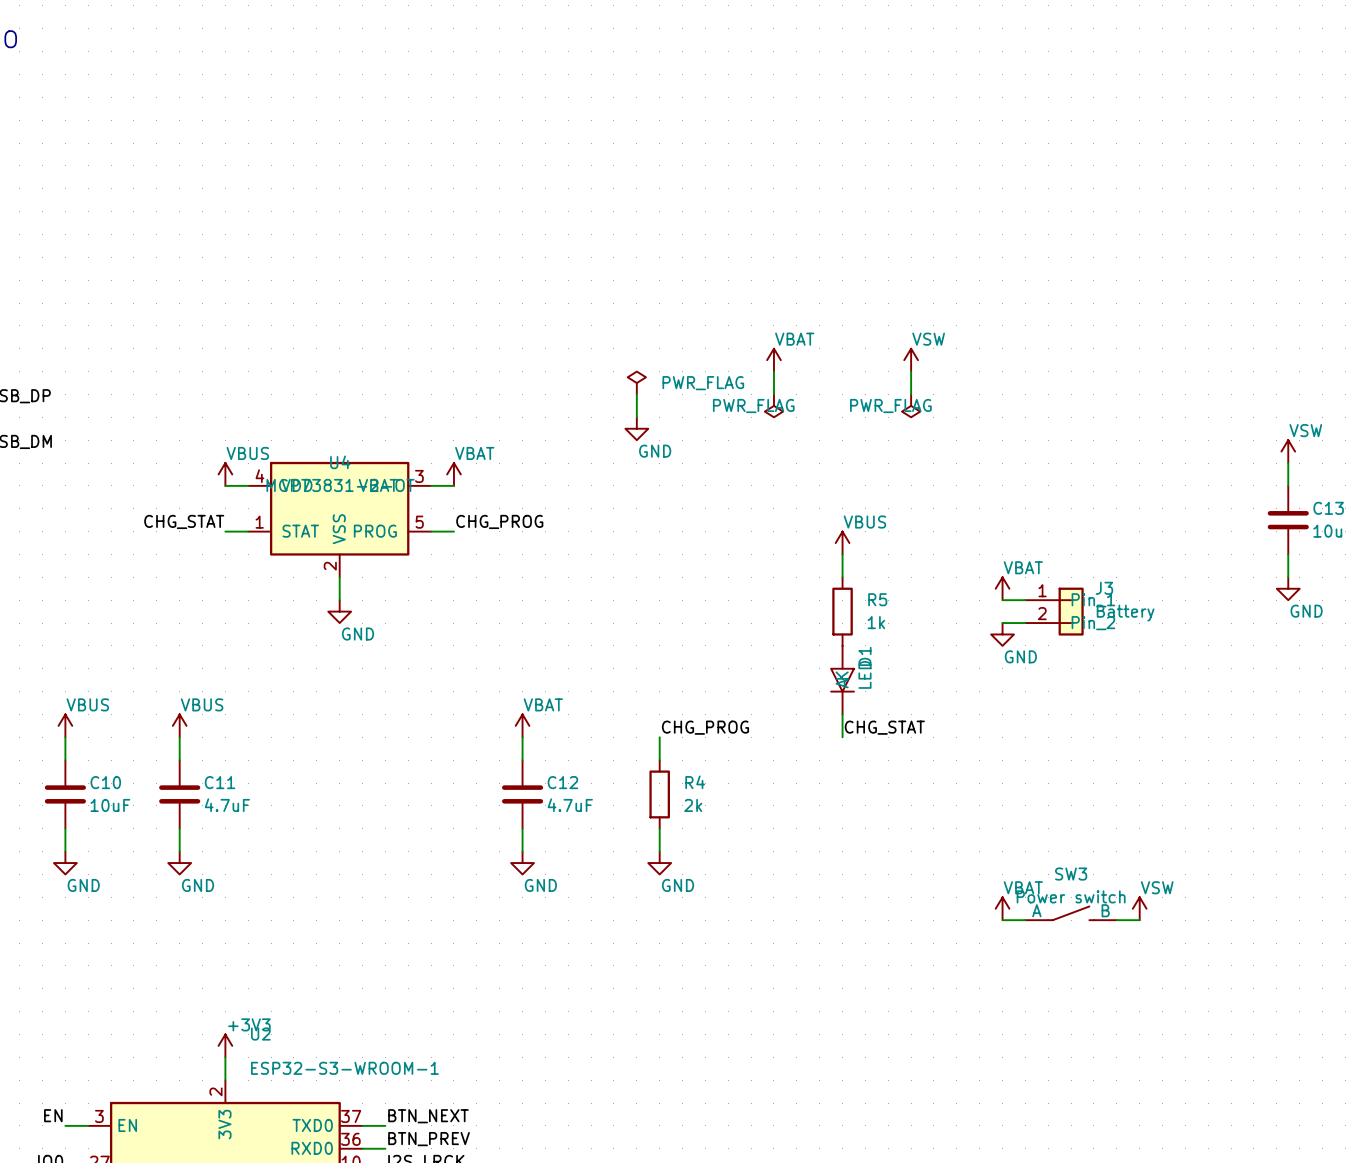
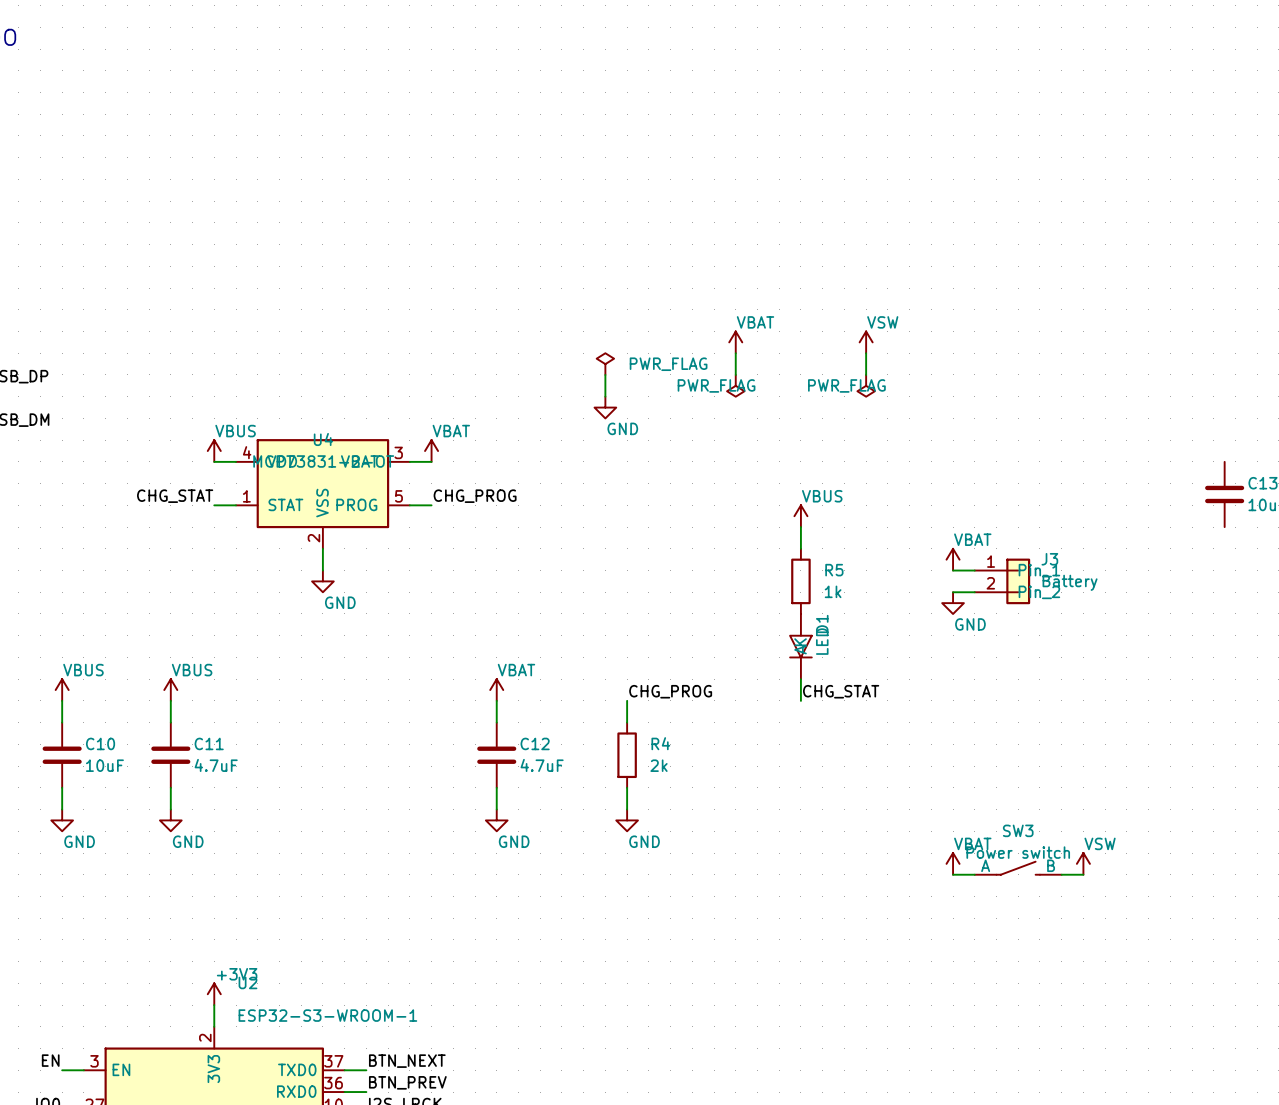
power symbol: VSW (1288, 451) -> none
wire: (1288, 463) (1288, 485) -> none
wire: (1288, 554) (1288, 577) -> none
power symbol: GND (1288, 588) -> none

